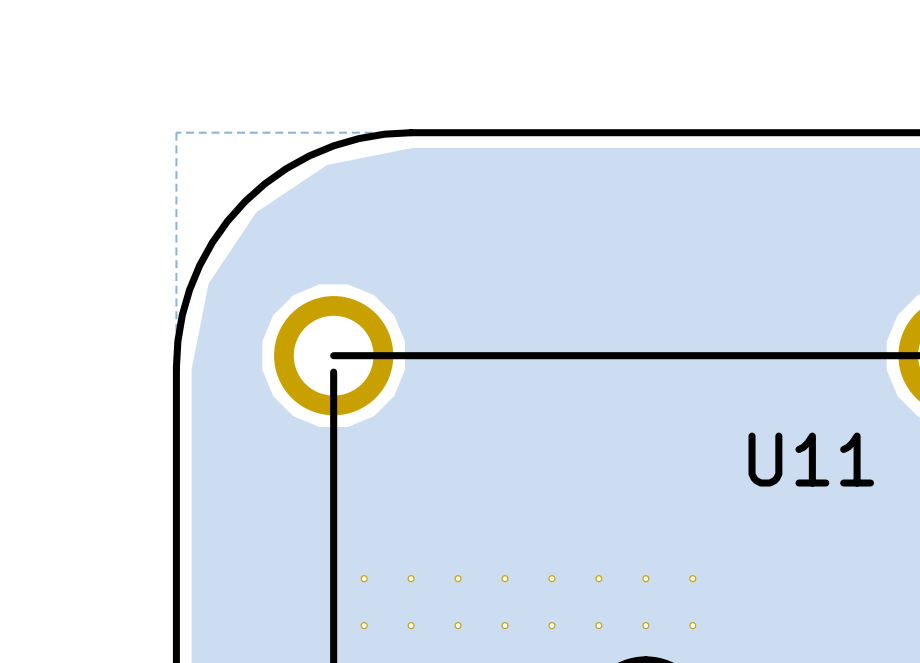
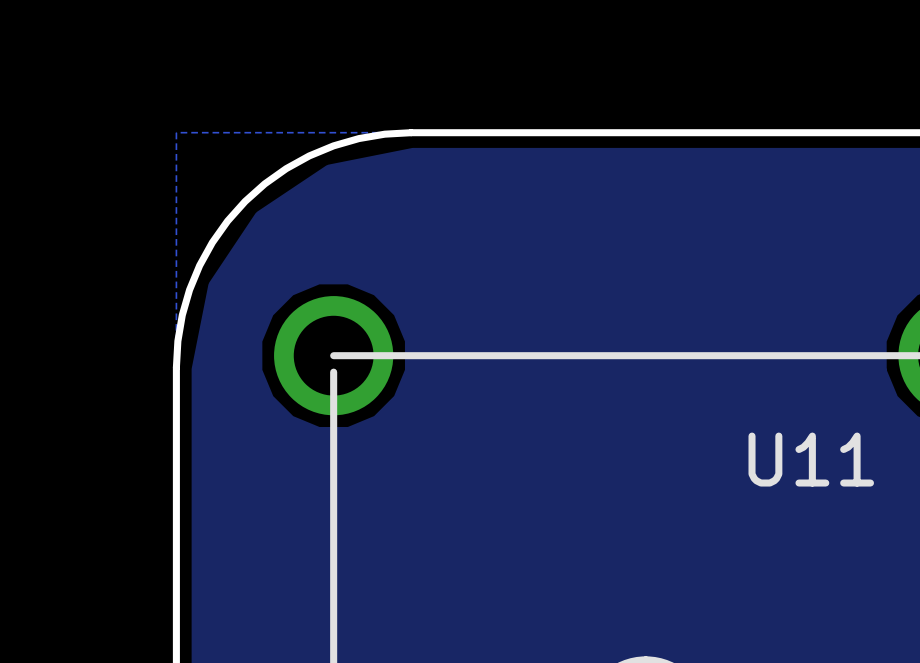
part: (364, 578) -> none
part: (411, 578) -> none
part: (458, 578) -> none
part: (505, 578) -> none
part: (551, 578) -> none
part: (598, 578) -> none
part: (645, 578) -> none
part: (692, 578) -> none
part: (364, 625) -> none
part: (411, 625) -> none
part: (458, 625) -> none
part: (505, 625) -> none
part: (551, 625) -> none
part: (598, 625) -> none
part: (645, 625) -> none
part: (692, 625) -> none

